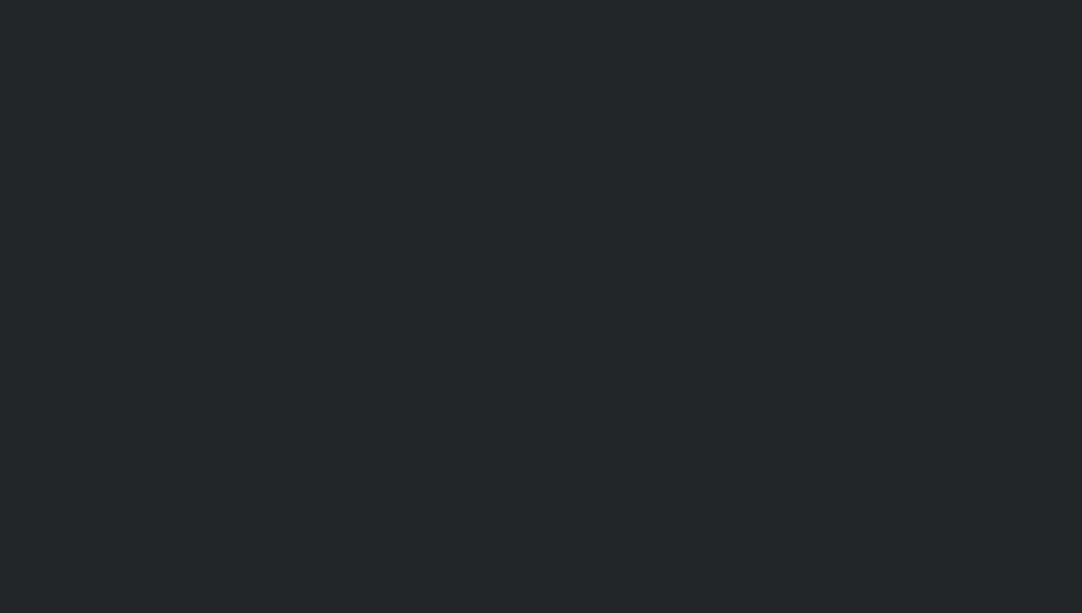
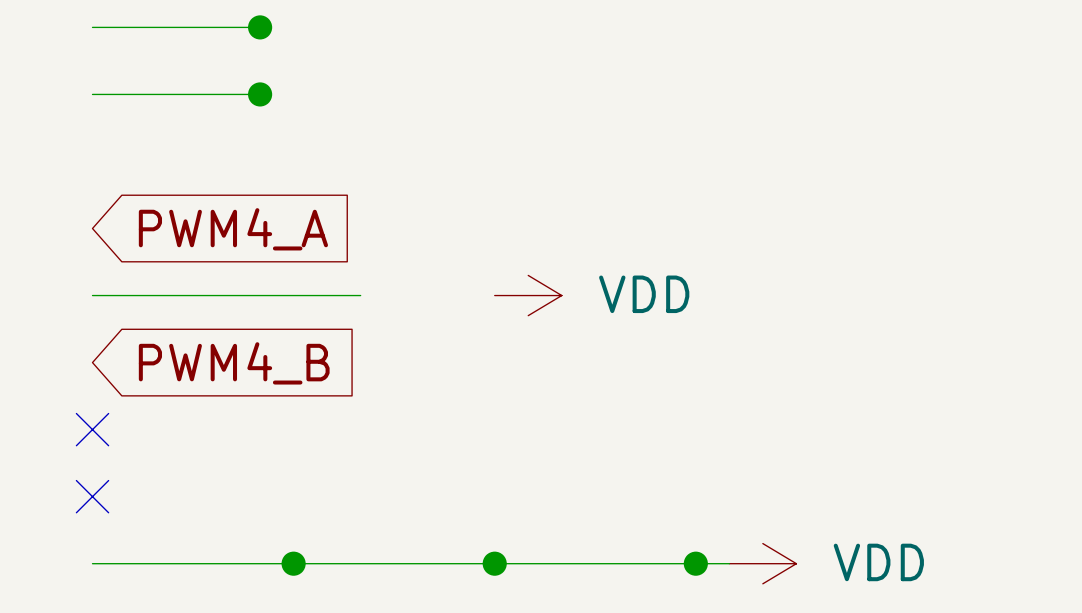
wire: none -> (92, 27) (260, 27)
junction: none -> (260, 27)
wire: none -> (92, 94) (260, 94)
junction: none -> (260, 94)
global label: none -> PWM4_A (233, 229)
wire: none -> (92, 295) (360, 295)
power symbol: none -> VDD (528, 295)
global label: none -> PWM4_B (234, 363)
no-connect mark: none -> (92, 429)
no-connect mark: none -> (92, 496)
wire: none -> (92, 563) (729, 563)
junction: none -> (293, 563)
junction: none -> (494, 563)
junction: none -> (695, 563)
power symbol: none -> VDD (762, 563)

